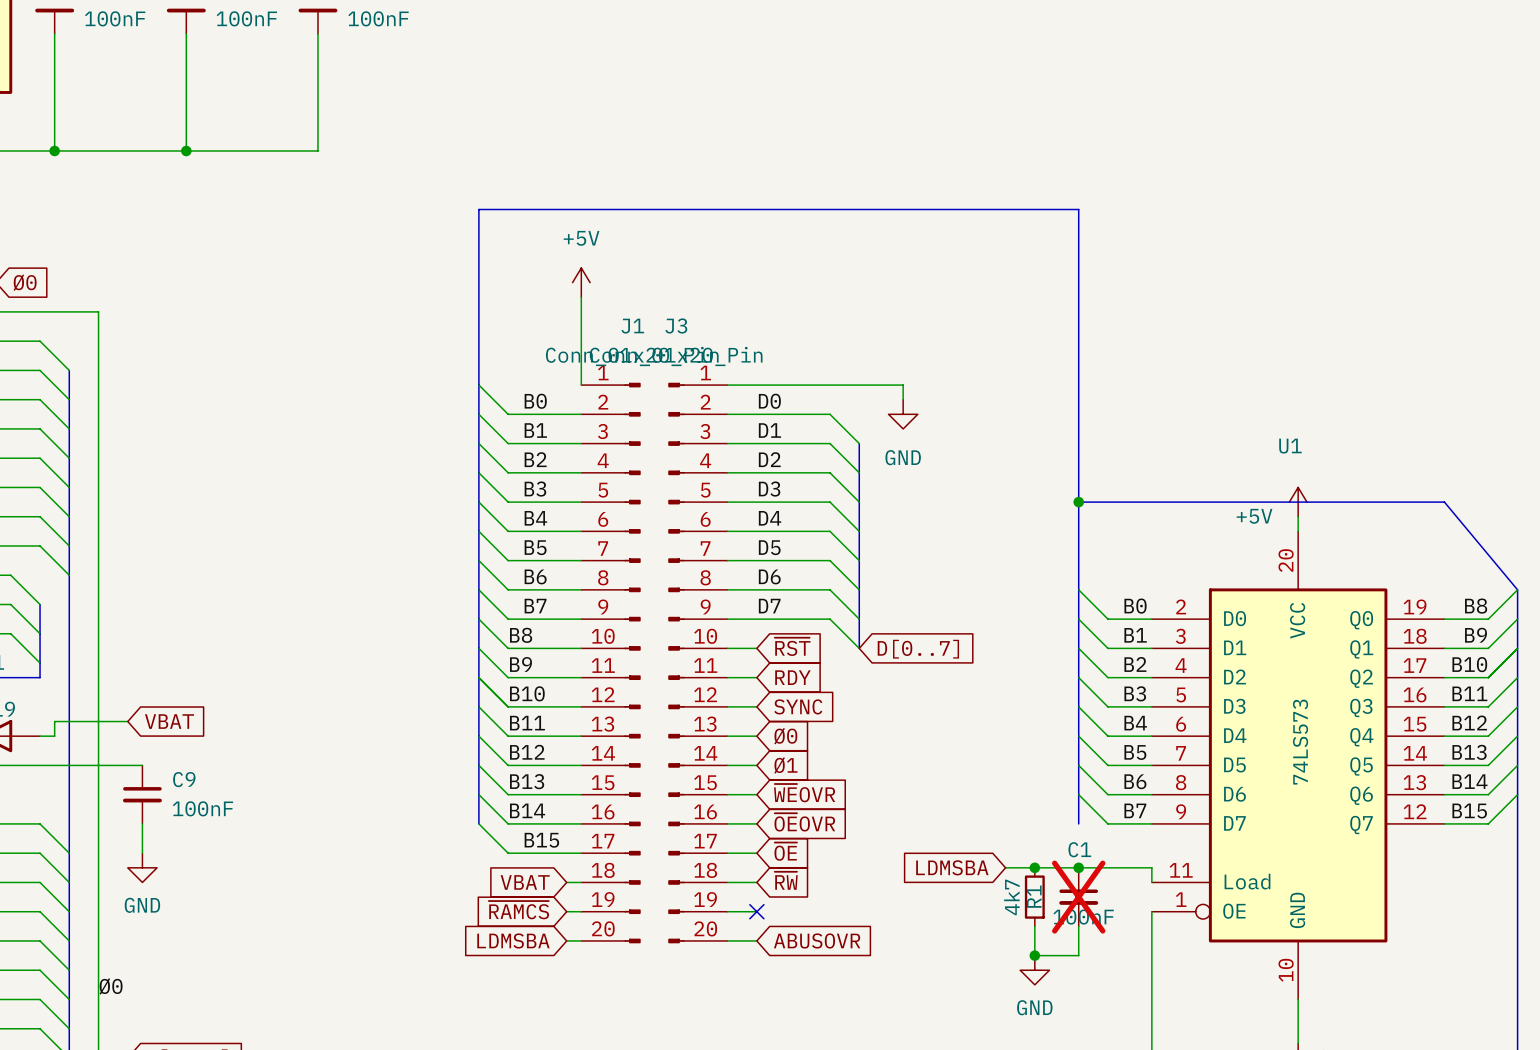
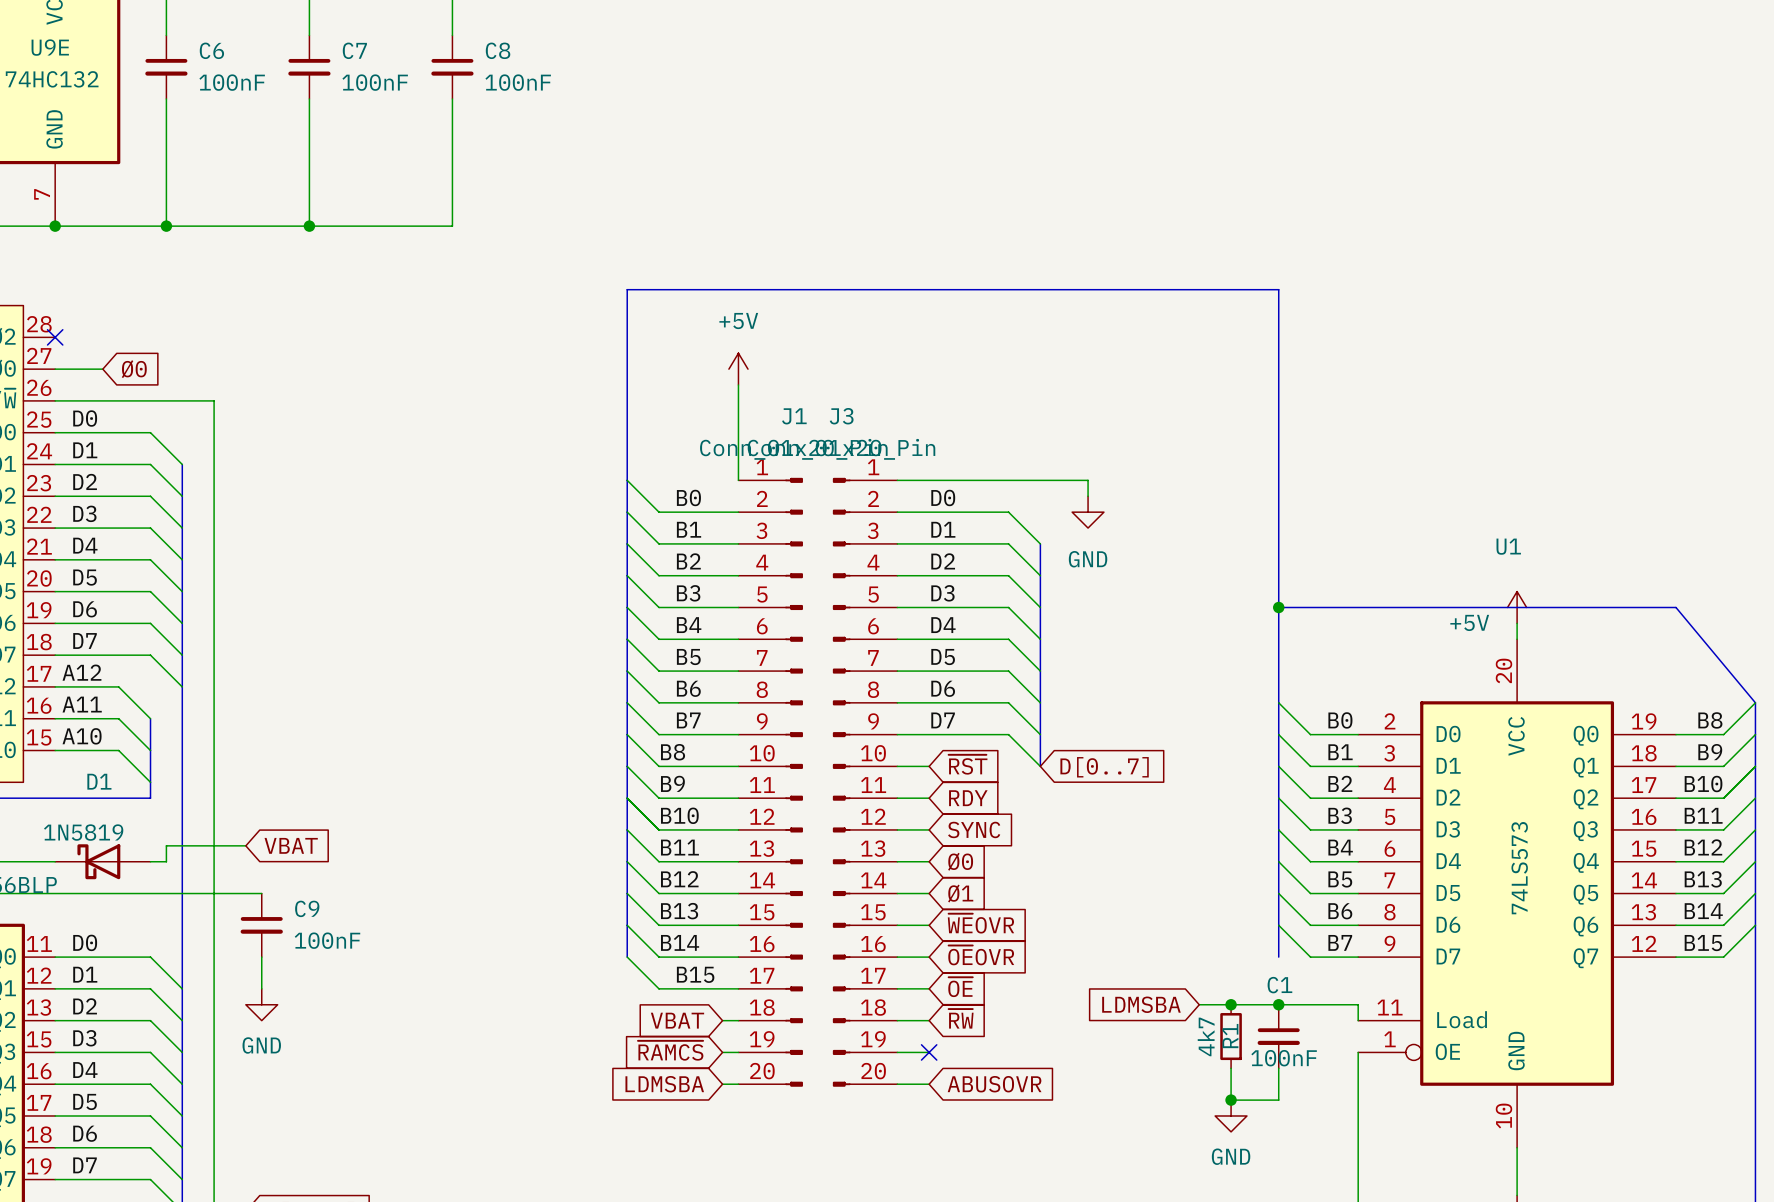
C1 do-not-place cross: (1078, 897) -> none
label: Ø0 (111, 986) -> none

